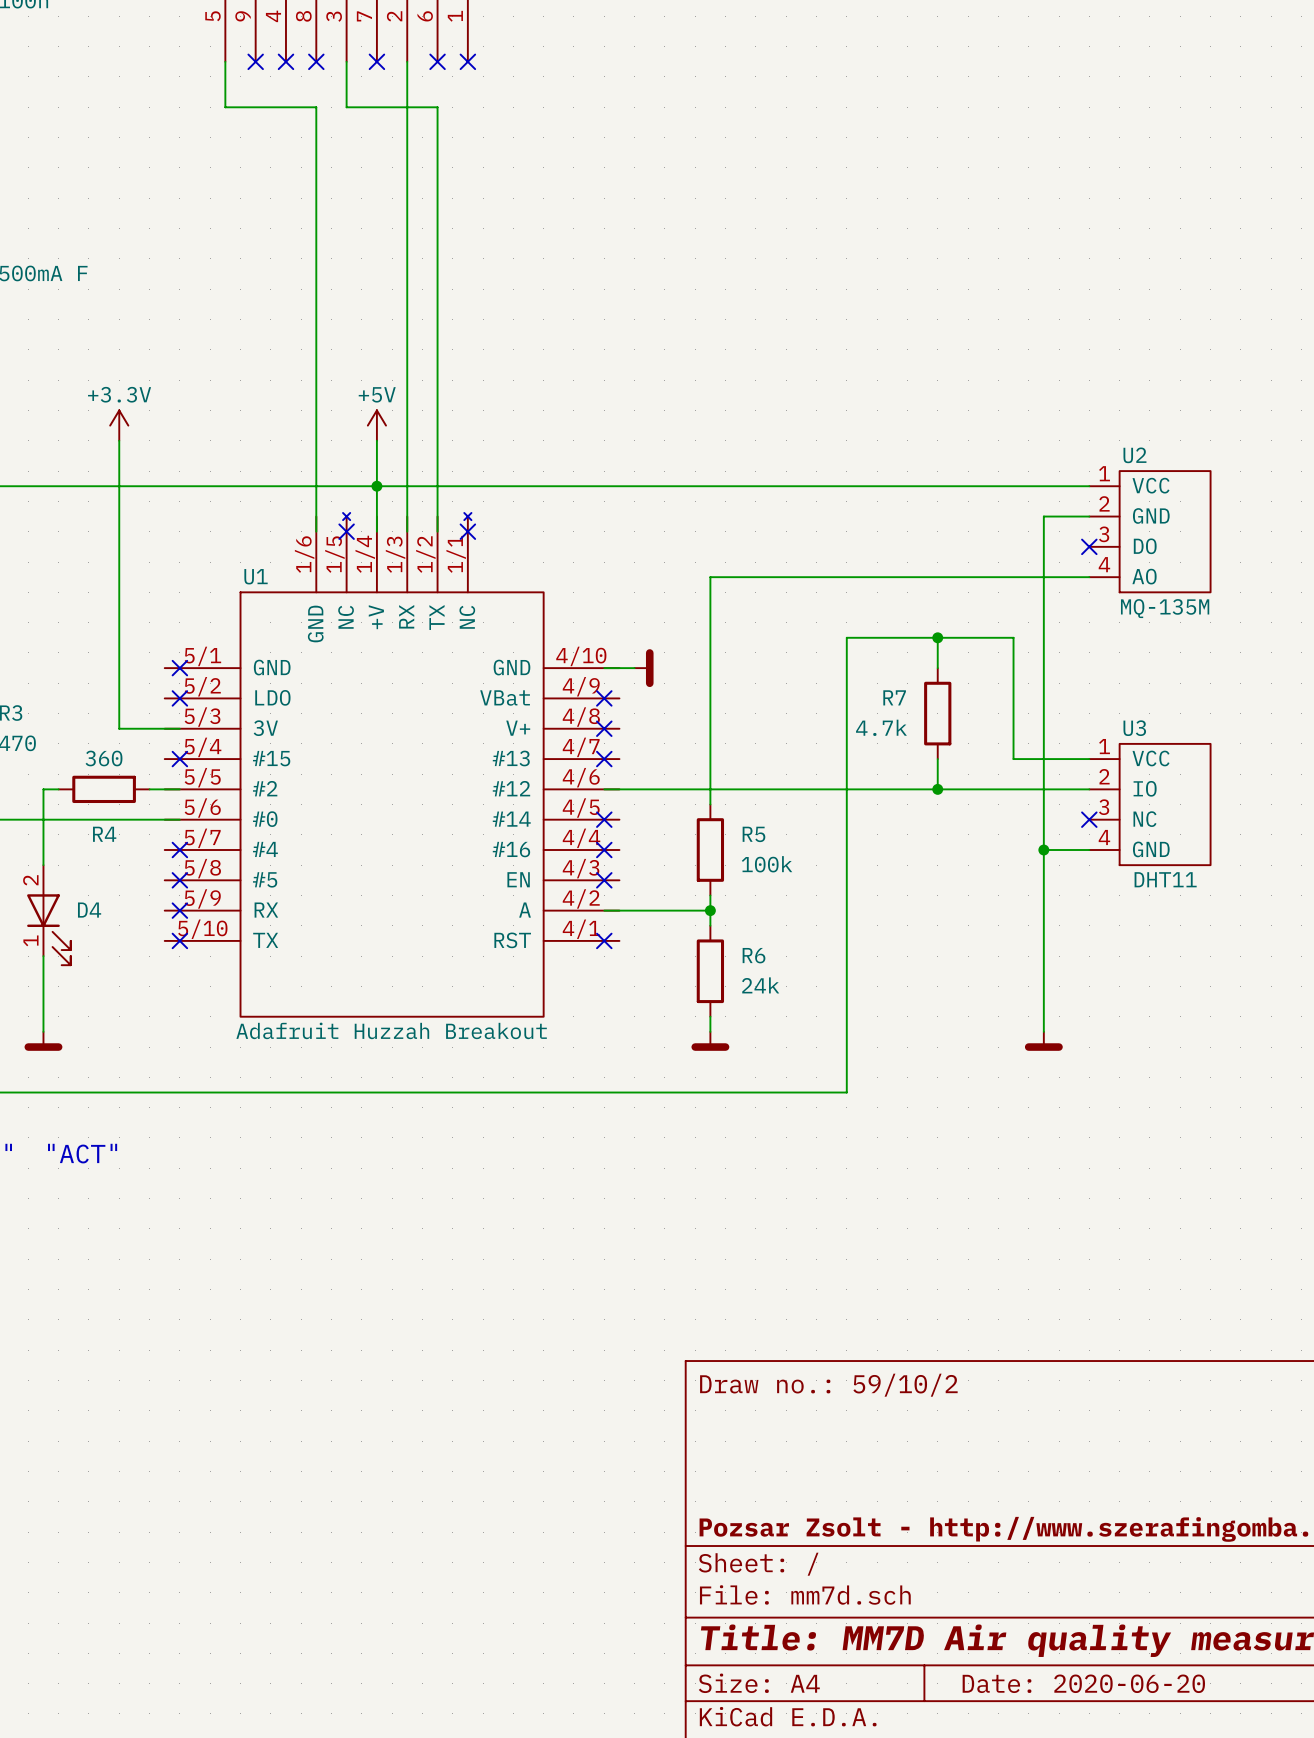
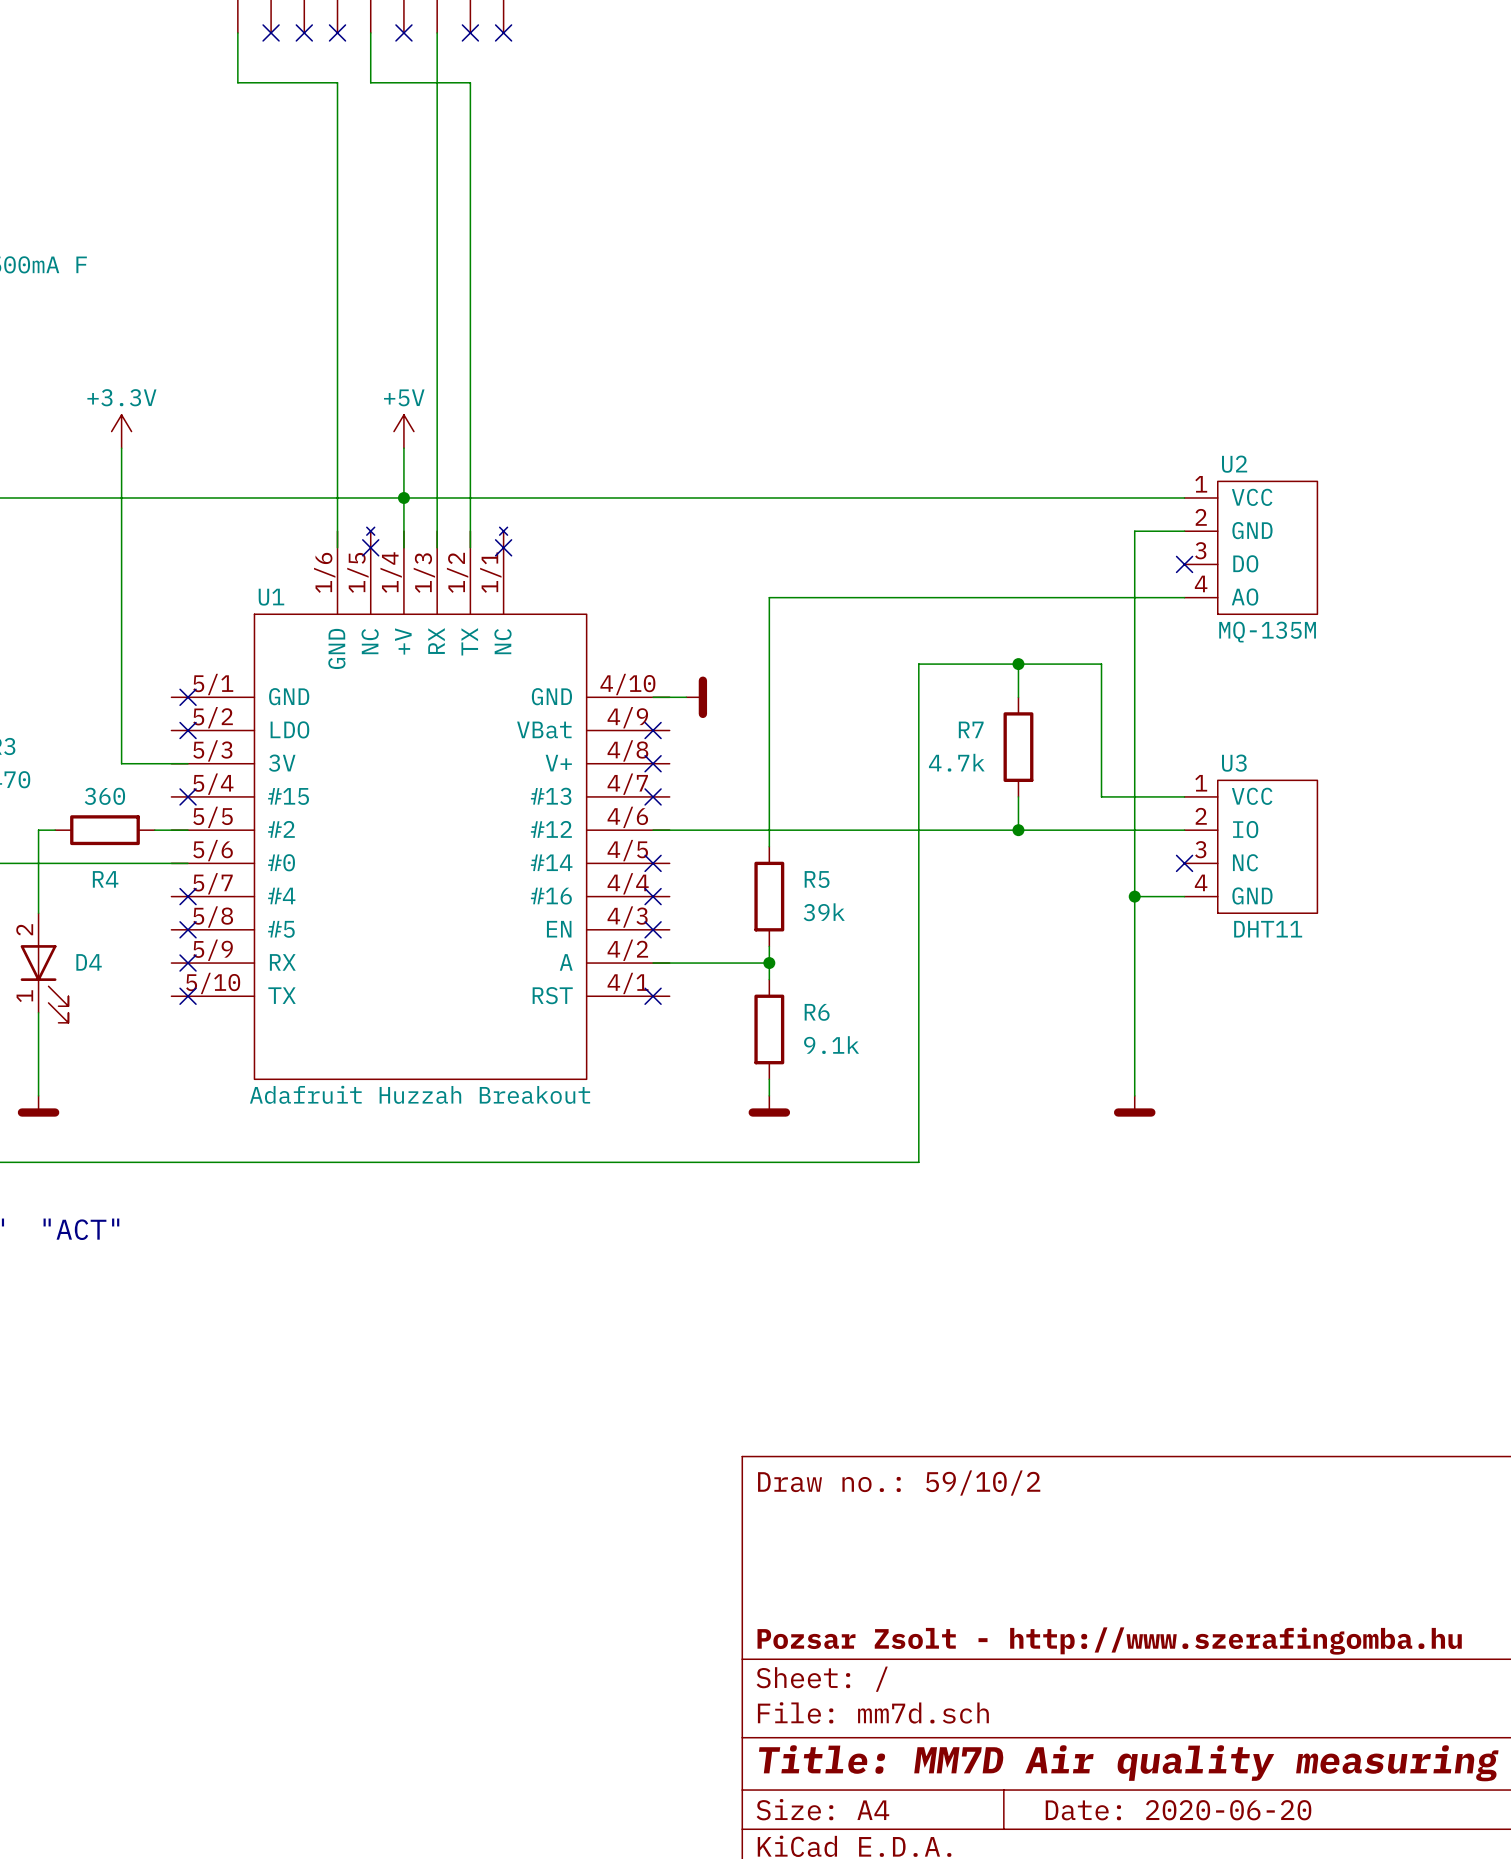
R5 value: 100k (767, 864) -> 39k (824, 912)
R6 value: 24k (760, 985) -> 9.1k (831, 1045)

